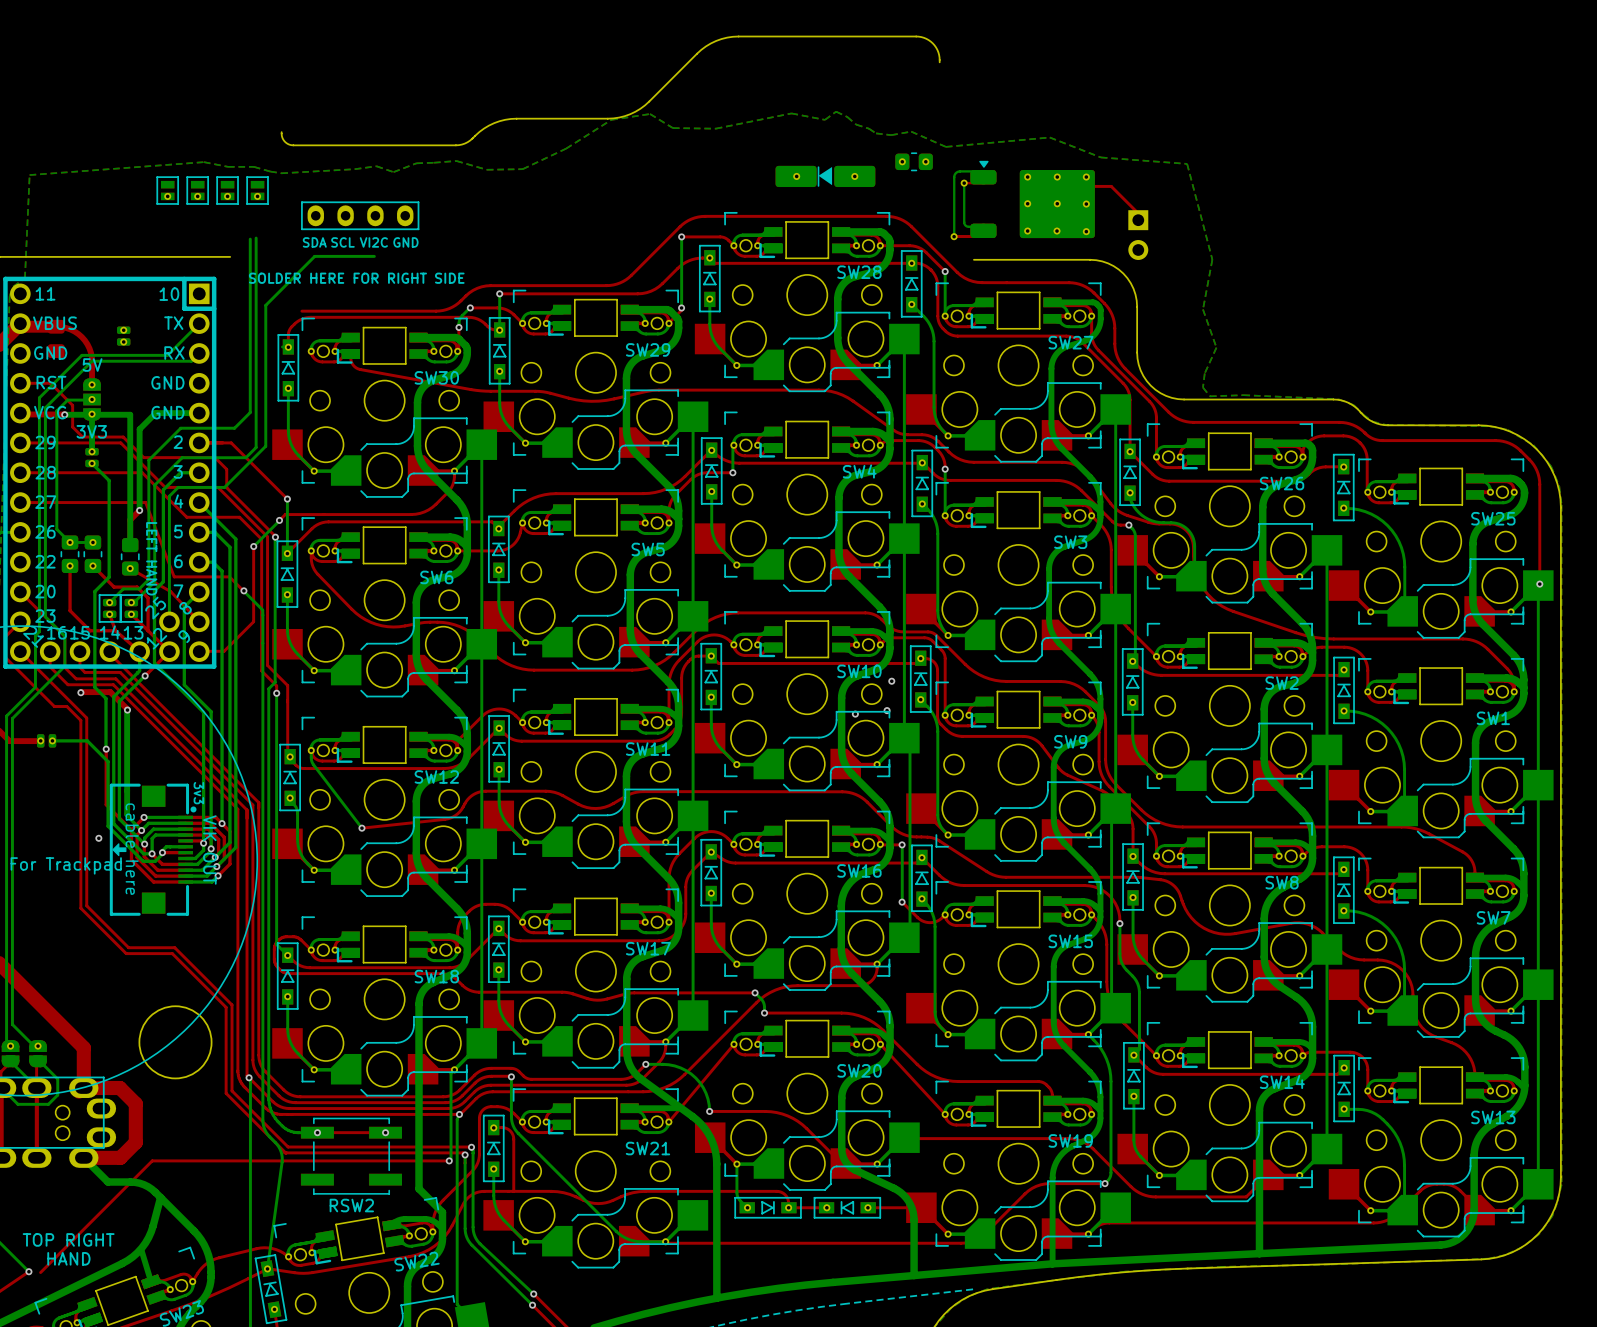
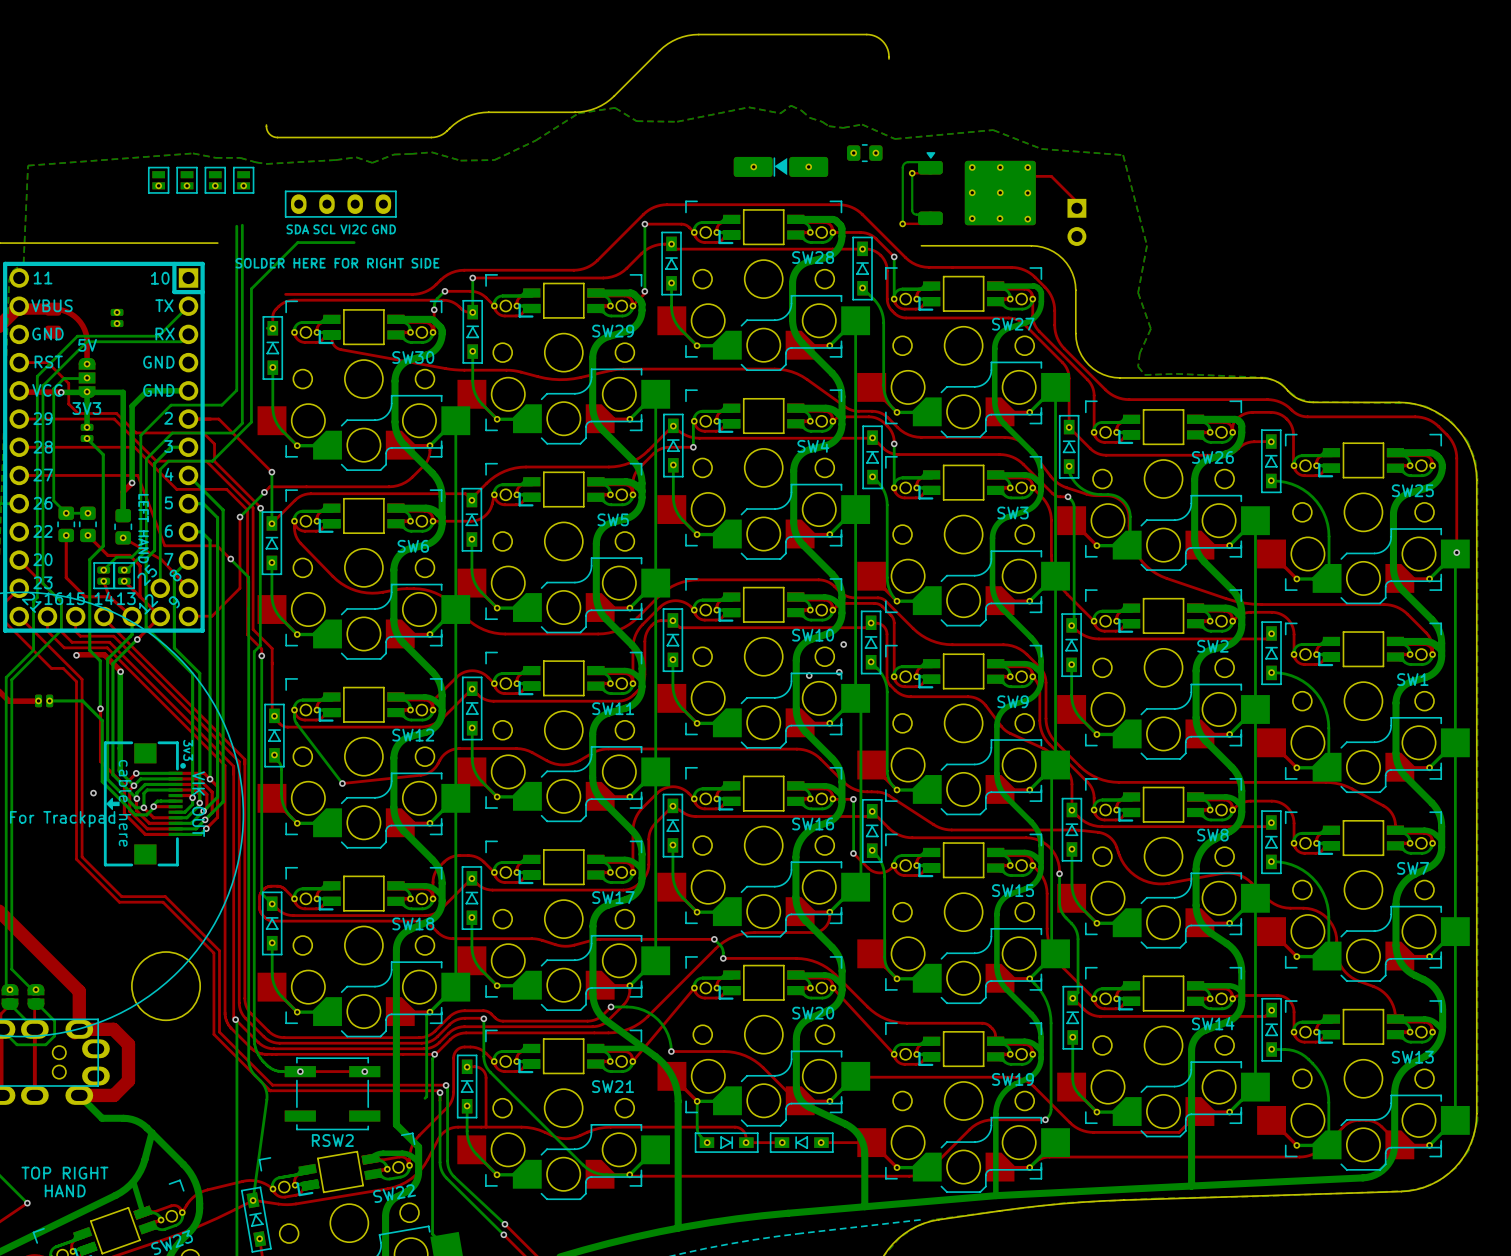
top track: (449, 1160) (152, 1160) (40, 1272) -> none
via: (449, 1160) -> none

